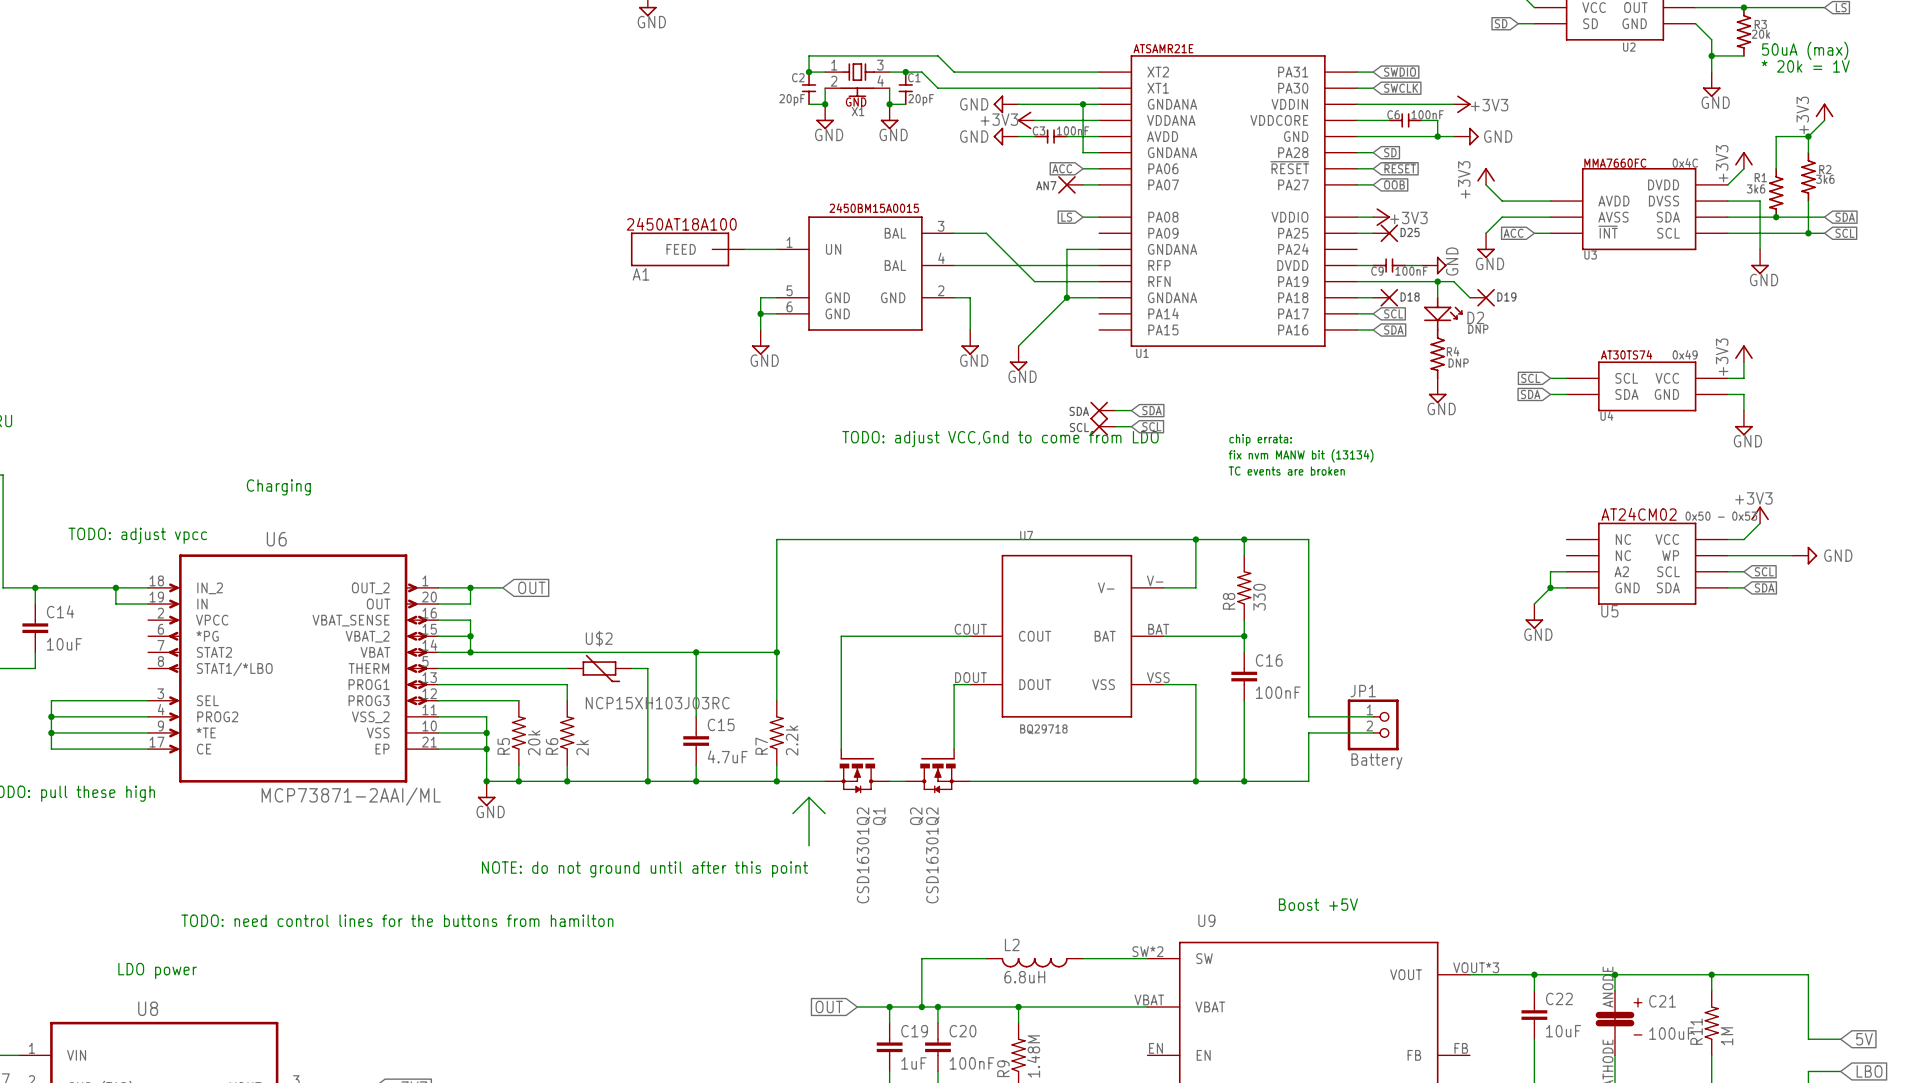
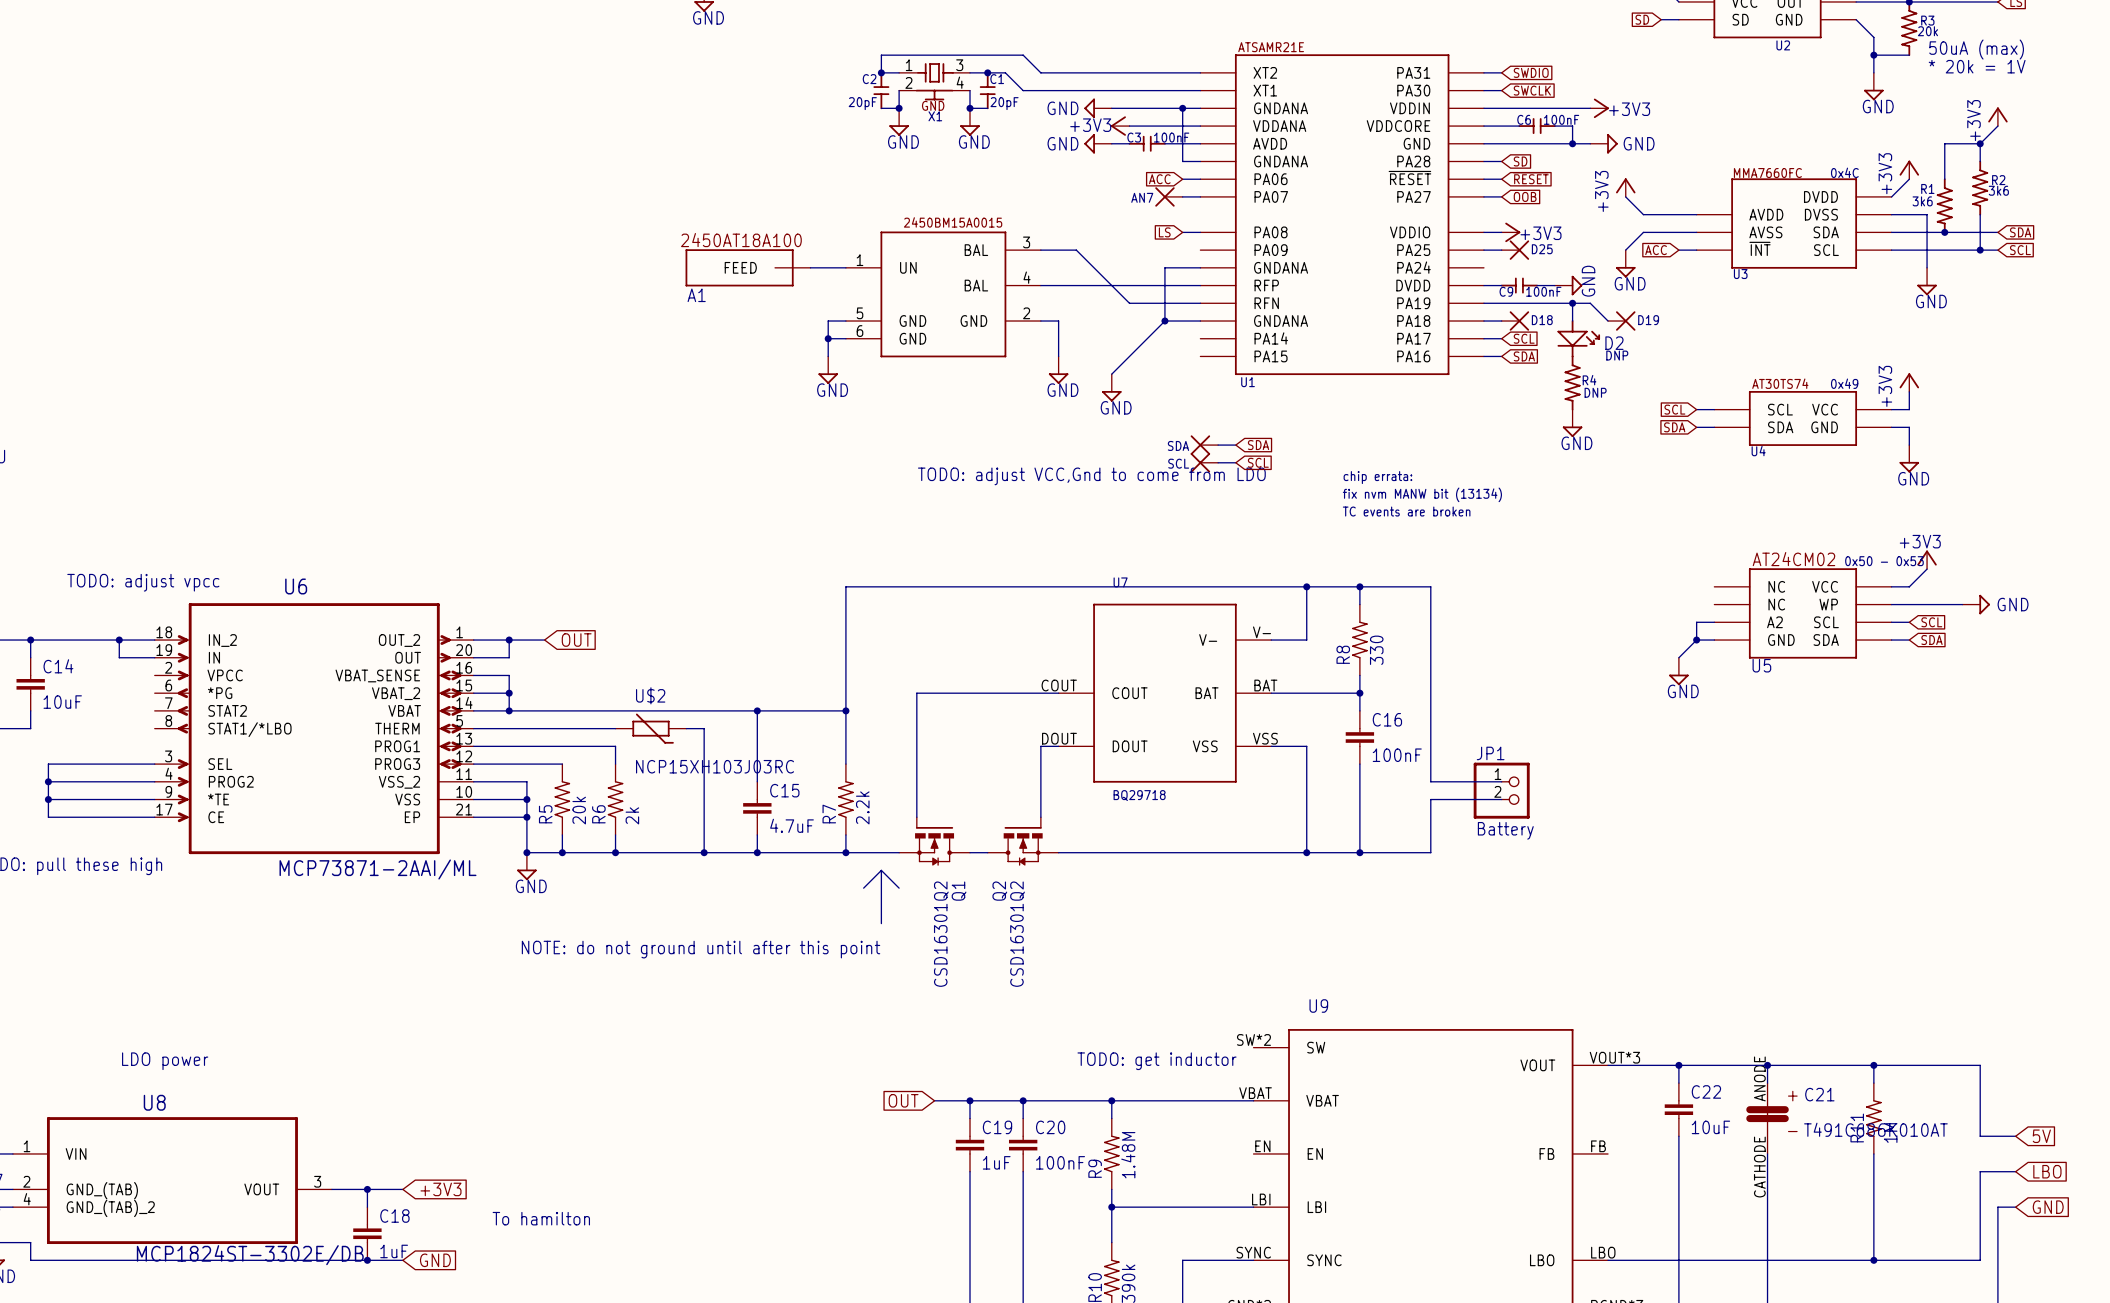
text: Charging (278, 487) -> none
text: Boost +5V (1318, 904) -> none
text: TODO: need control lines for the buttons from hamilton (397, 920) -> none
wire: (986, 958) (921, 958) (921, 1007) -> none
wire: (1083, 958) (1147, 958) -> none
L2: 6.8uH (1034, 962) -> none
text: none -> TODO: get inductor (1157, 1061)
junction: (921, 1007) -> none
C21 value: 100uF (1671, 1033) -> T491C686K010AT (1875, 1129)

